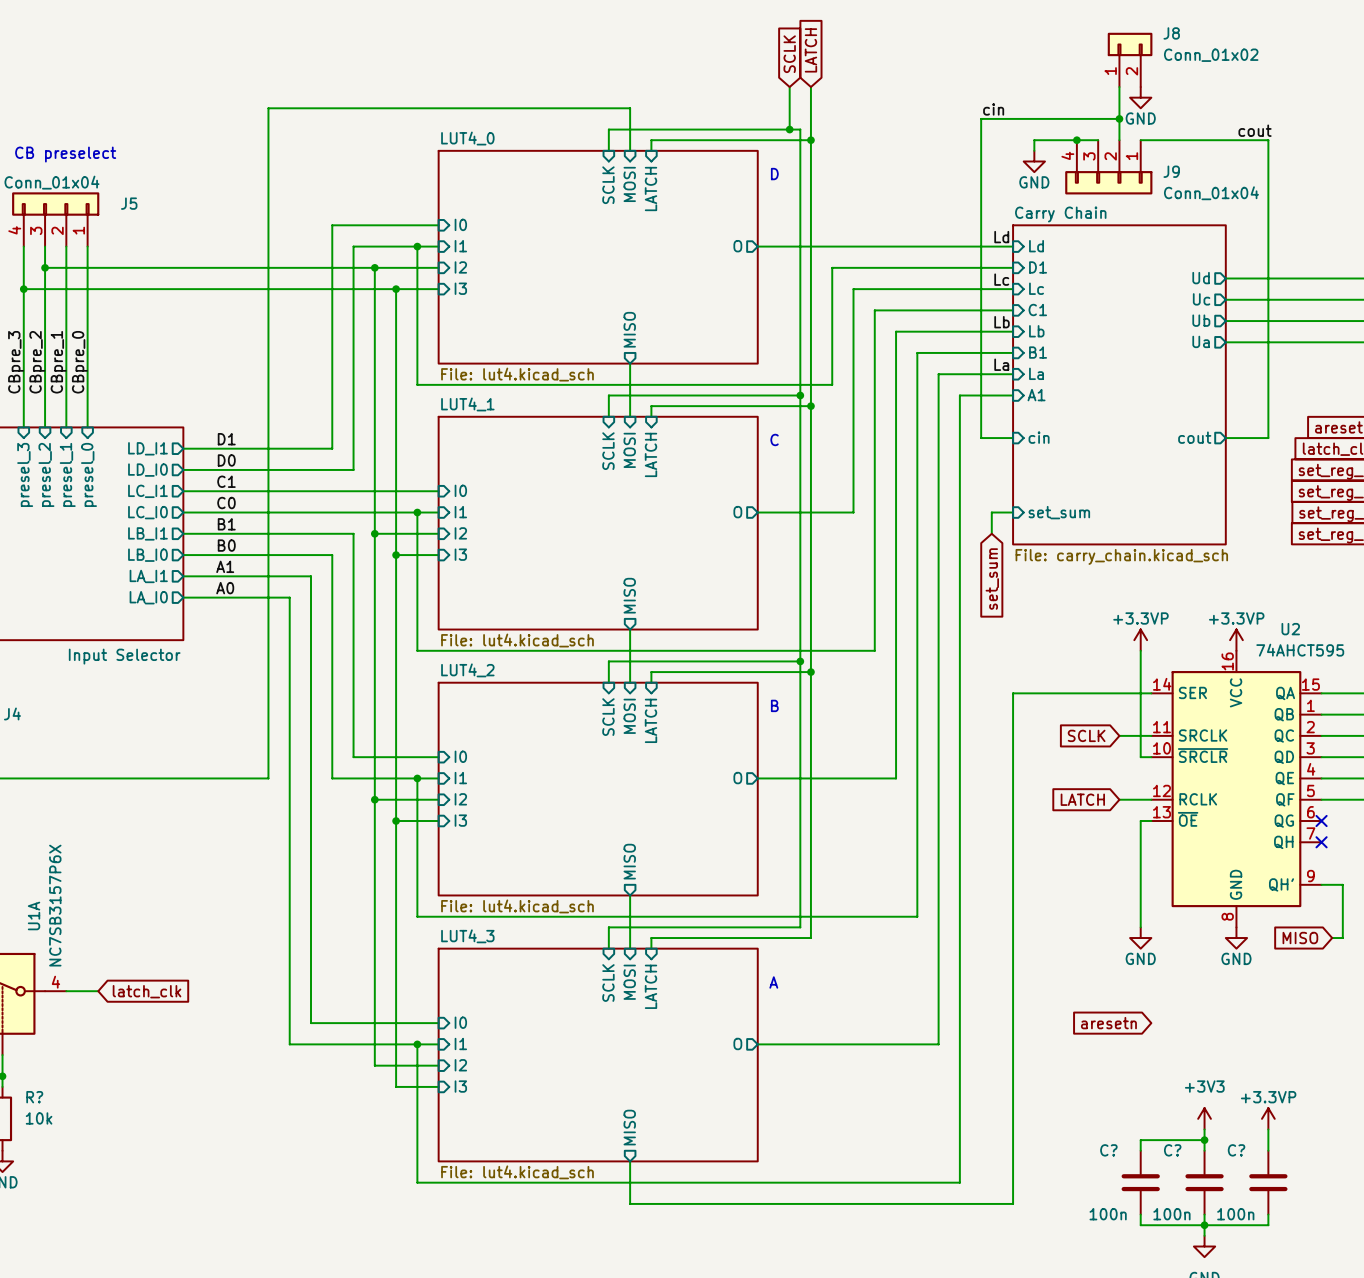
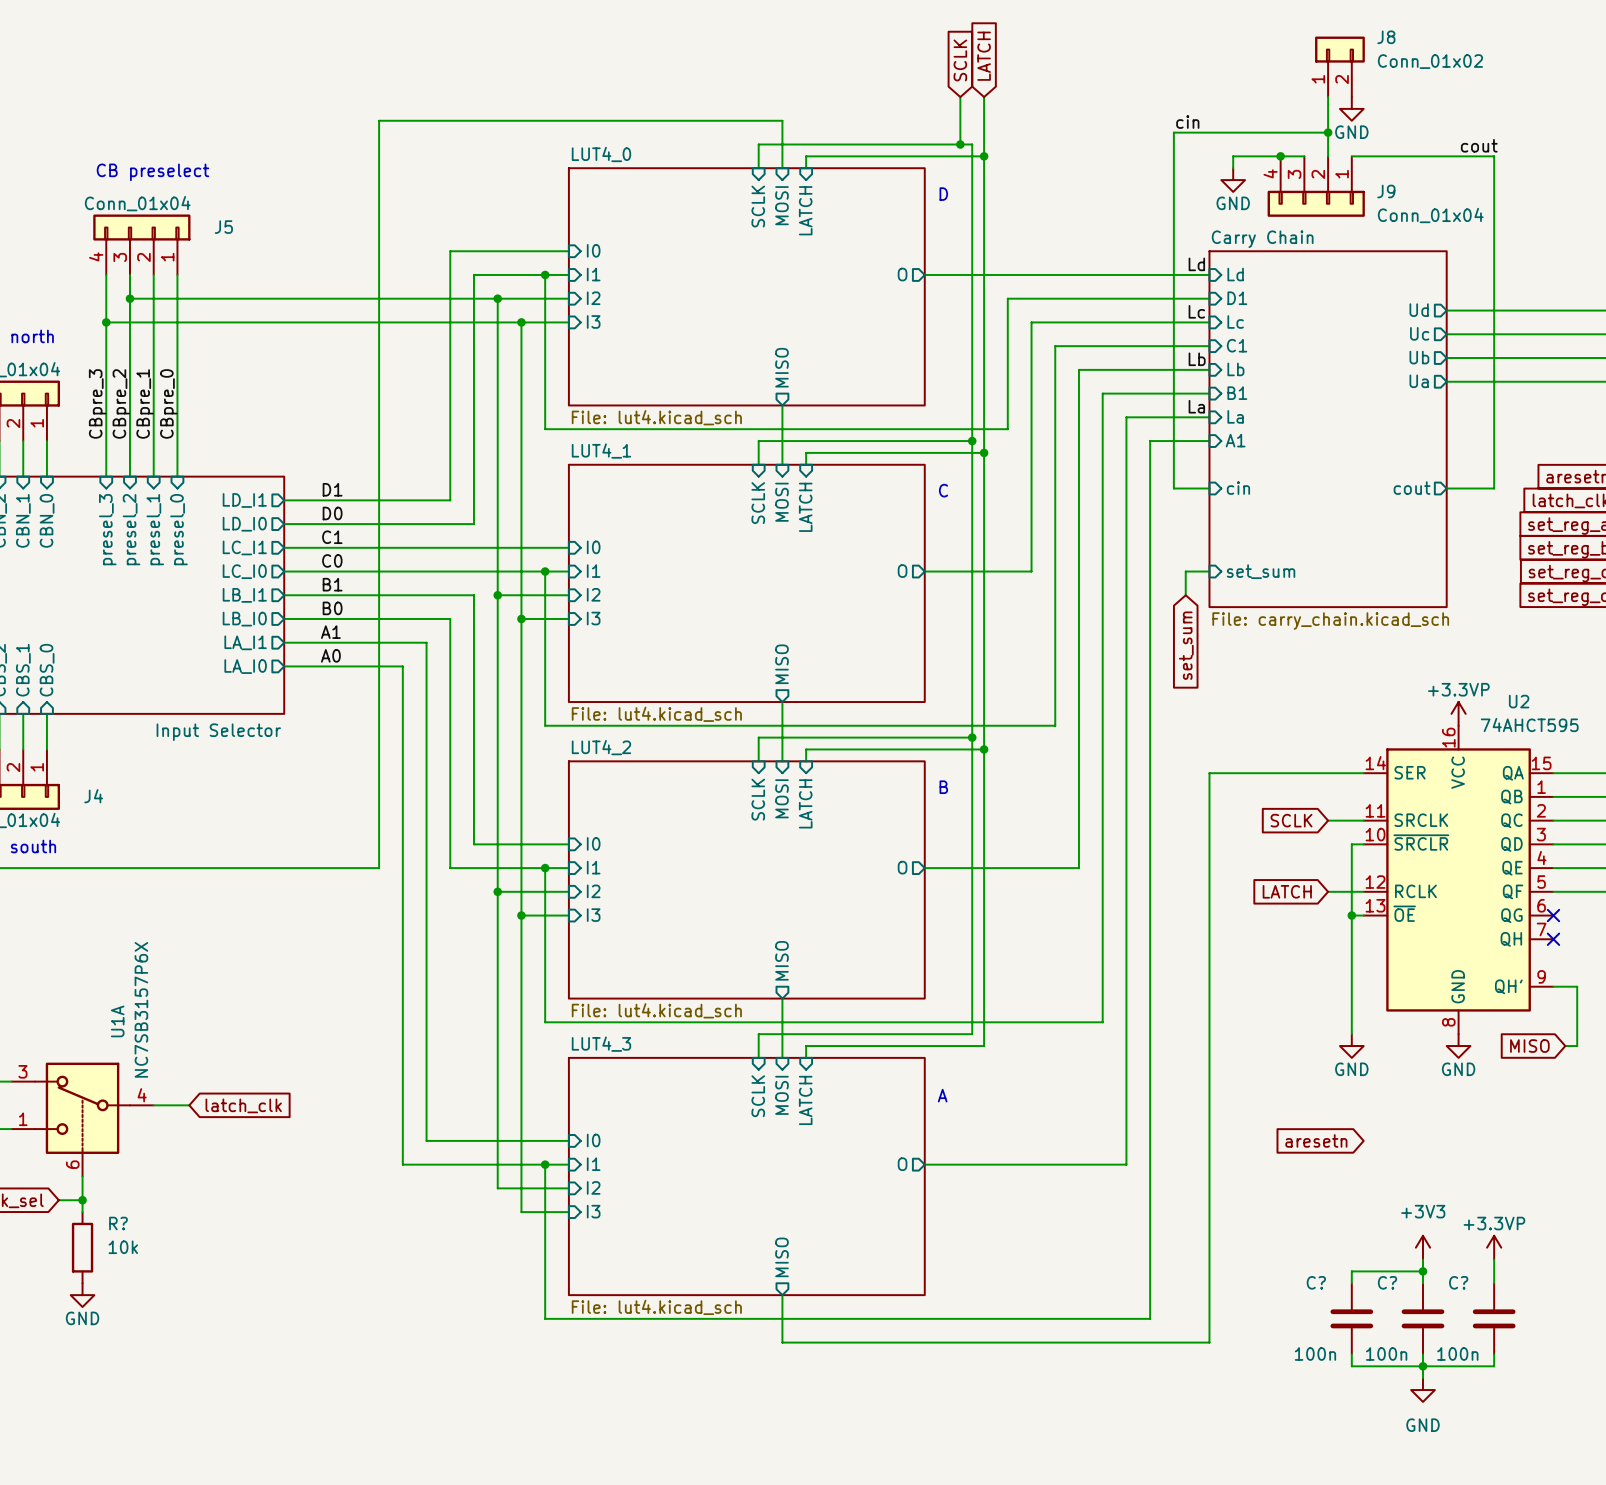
power symbol: +3.3VP (1140, 640) -> none
wire: (1140, 650) (1140, 757) -> (1351, 915) (1351, 844)
junction: none -> (1351, 915)

